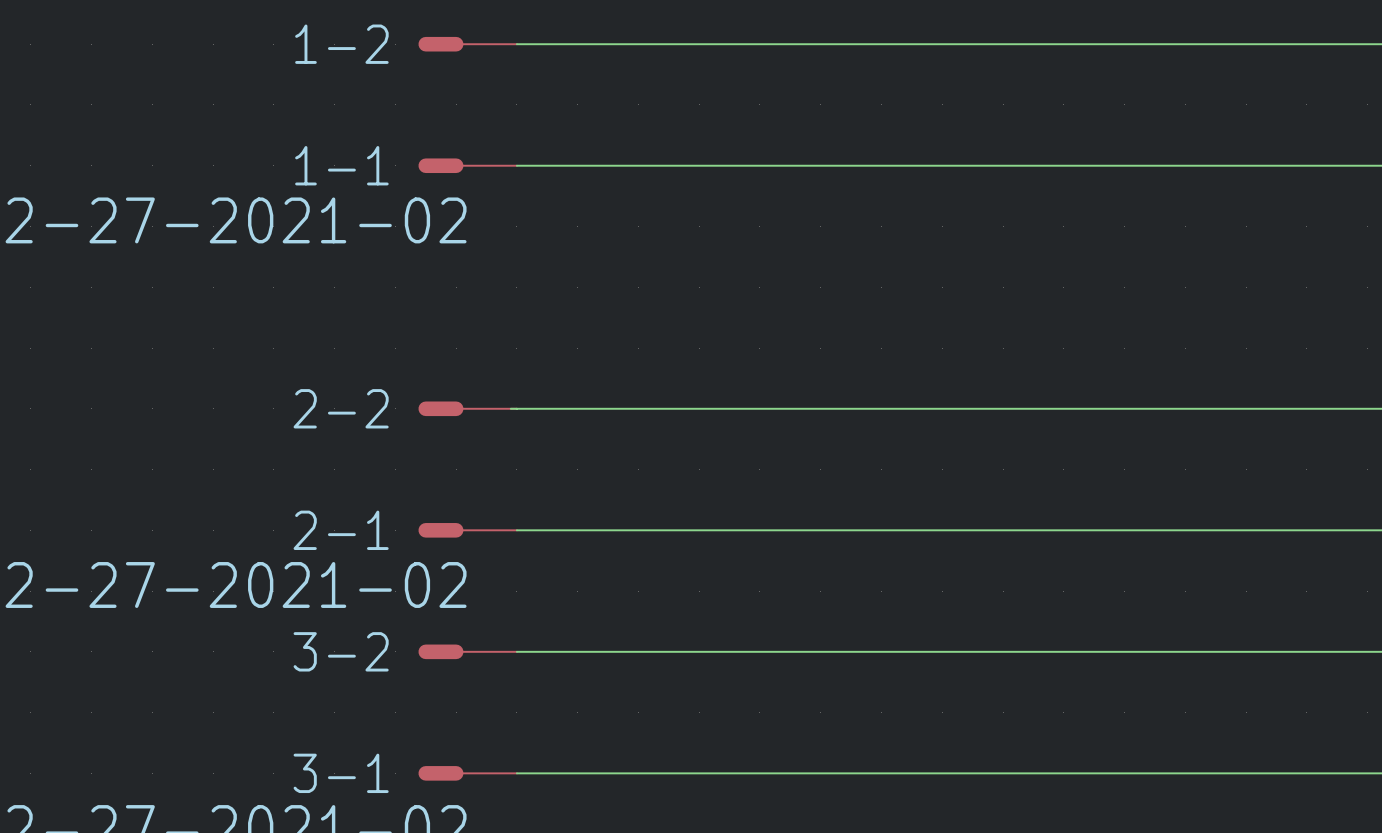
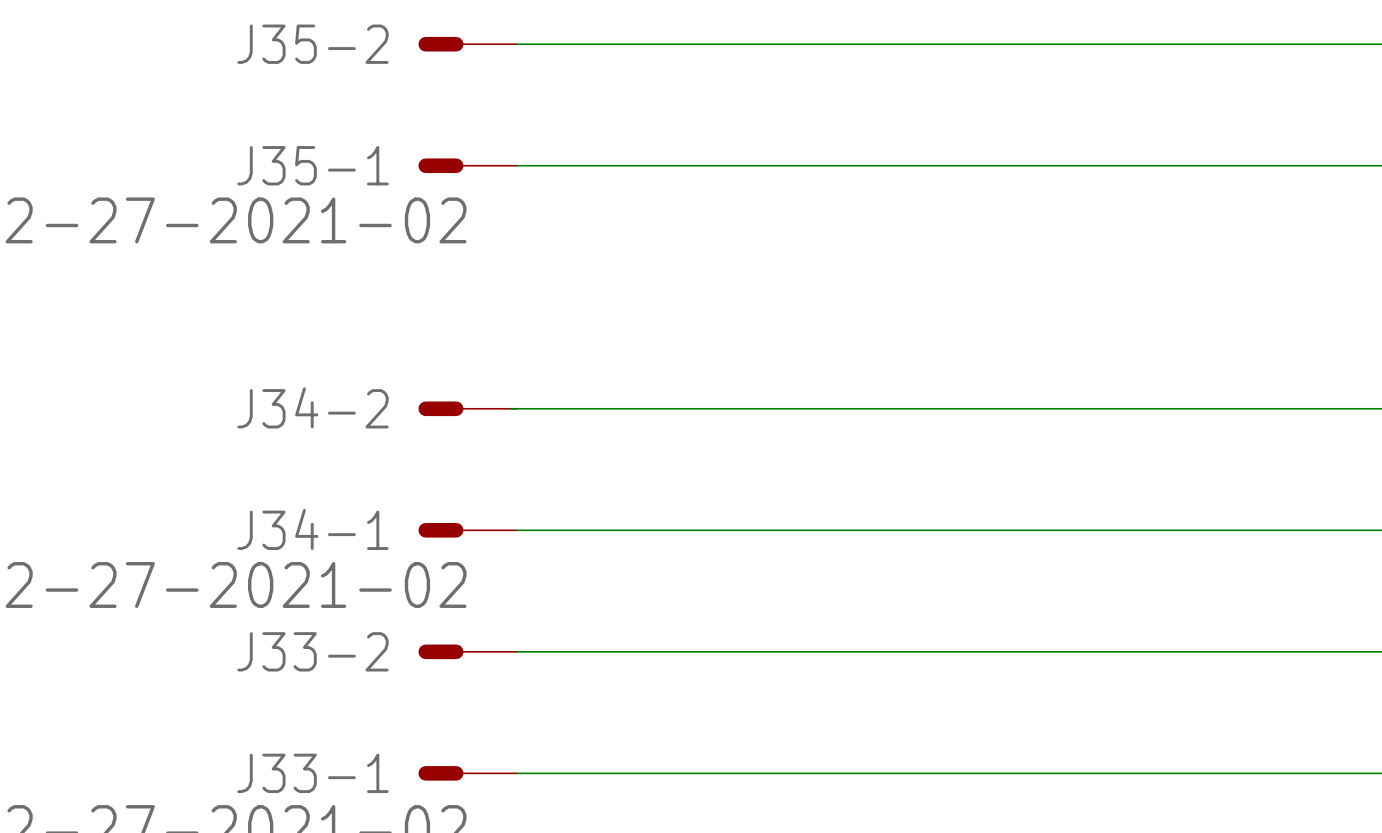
1-2 name: 1-2 (341, 44) -> J35-2 (313, 44)
1-1 name: 1-1 (341, 165) -> J35-1 (313, 165)
2-2 name: 2-2 (341, 408) -> J34-2 (313, 407)
2-1 name: 2-1 (341, 530) -> J34-1 (313, 529)
3-2 name: 3-2 (341, 651) -> J33-2 (313, 651)
3-1 name: 3-1 (341, 773) -> J33-1 (313, 773)

